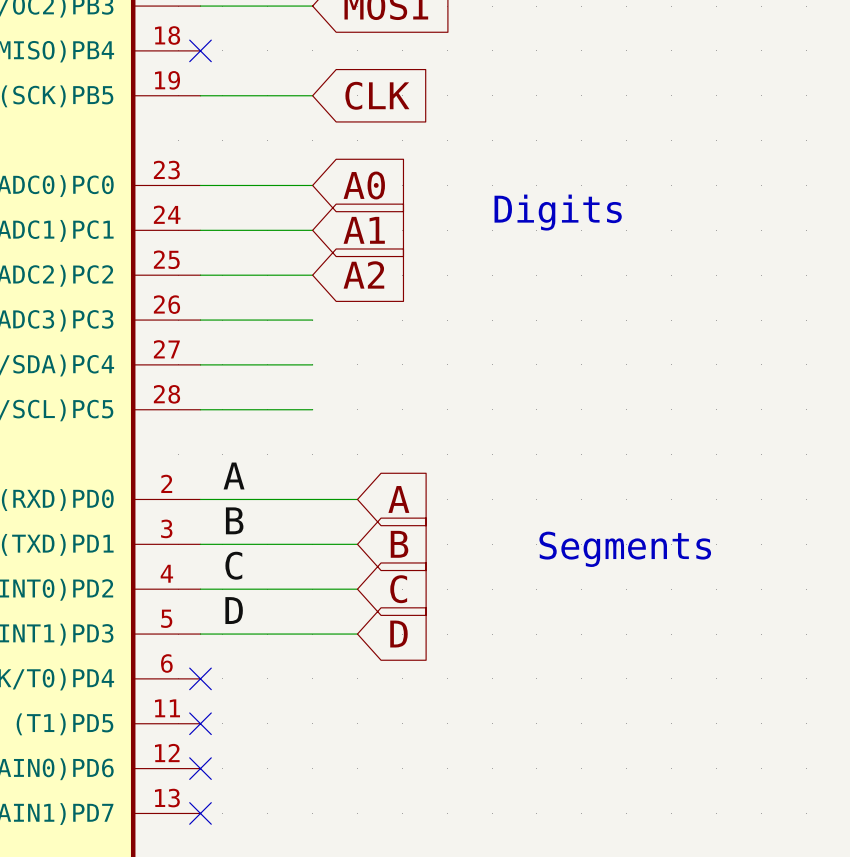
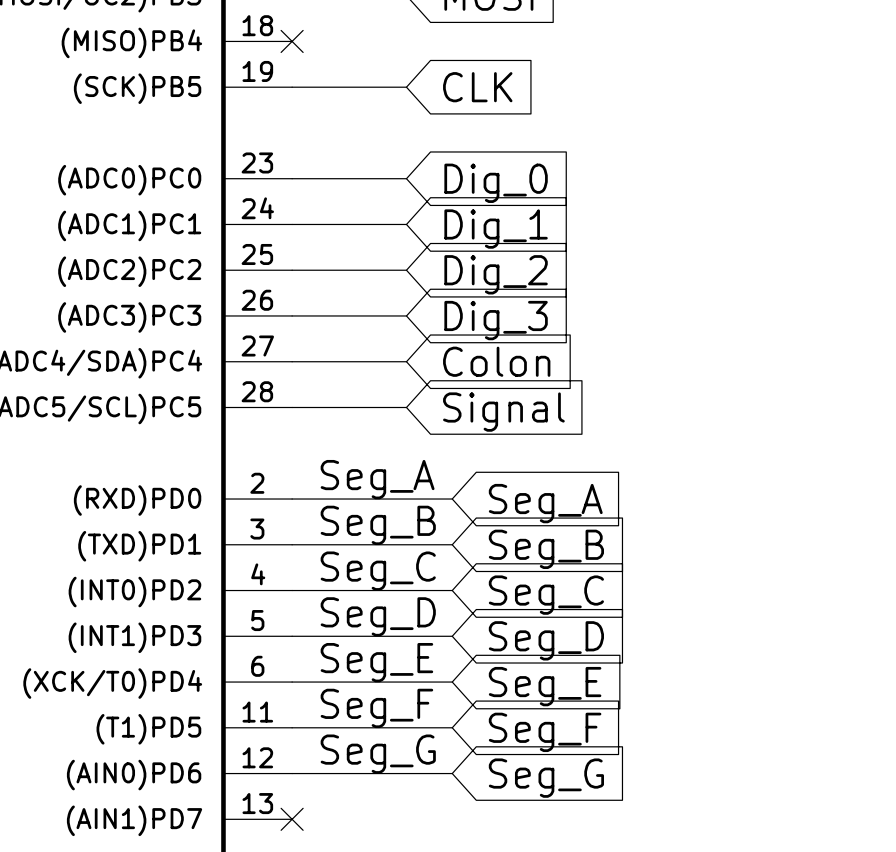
global label: A0 (364, 185) -> Dig_0 (496, 183)
text: Digits (558, 212) -> none
global label: A1 (364, 230) -> Dig_1 (496, 229)
global label: A2 (363, 274) -> Dig_2 (496, 274)
global label: none -> Dig_3 (496, 320)
global label: none -> Colon (496, 361)
global label: none -> Signal (503, 412)
label: A (234, 475) -> Seg_A (377, 479)
global label: A (398, 499) -> Seg_A (545, 503)
label: B (234, 520) -> Seg_B (378, 525)
global label: B (399, 544) -> Seg_B (546, 549)
text: Segments (625, 549) -> none
label: C (233, 565) -> Seg_C (378, 571)
global label: C (398, 589) -> Seg_C (546, 595)
label: D (234, 610) -> Seg_D (378, 616)
global label: D (398, 634) -> Seg_D (546, 640)
label: none -> Seg_E (376, 662)
wire: none -> (292, 682) (452, 682)
no-connect mark: (200, 678) -> none
global label: none -> Seg_E (545, 686)
label: none -> Seg_F (376, 708)
wire: none -> (292, 727) (452, 727)
no-connect mark: (200, 723) -> none
global label: none -> Seg_F (545, 732)
label: none -> Seg_G (378, 754)
wire: none -> (292, 773) (452, 773)
no-connect mark: (200, 768) -> none
global label: none -> Seg_G (546, 778)

